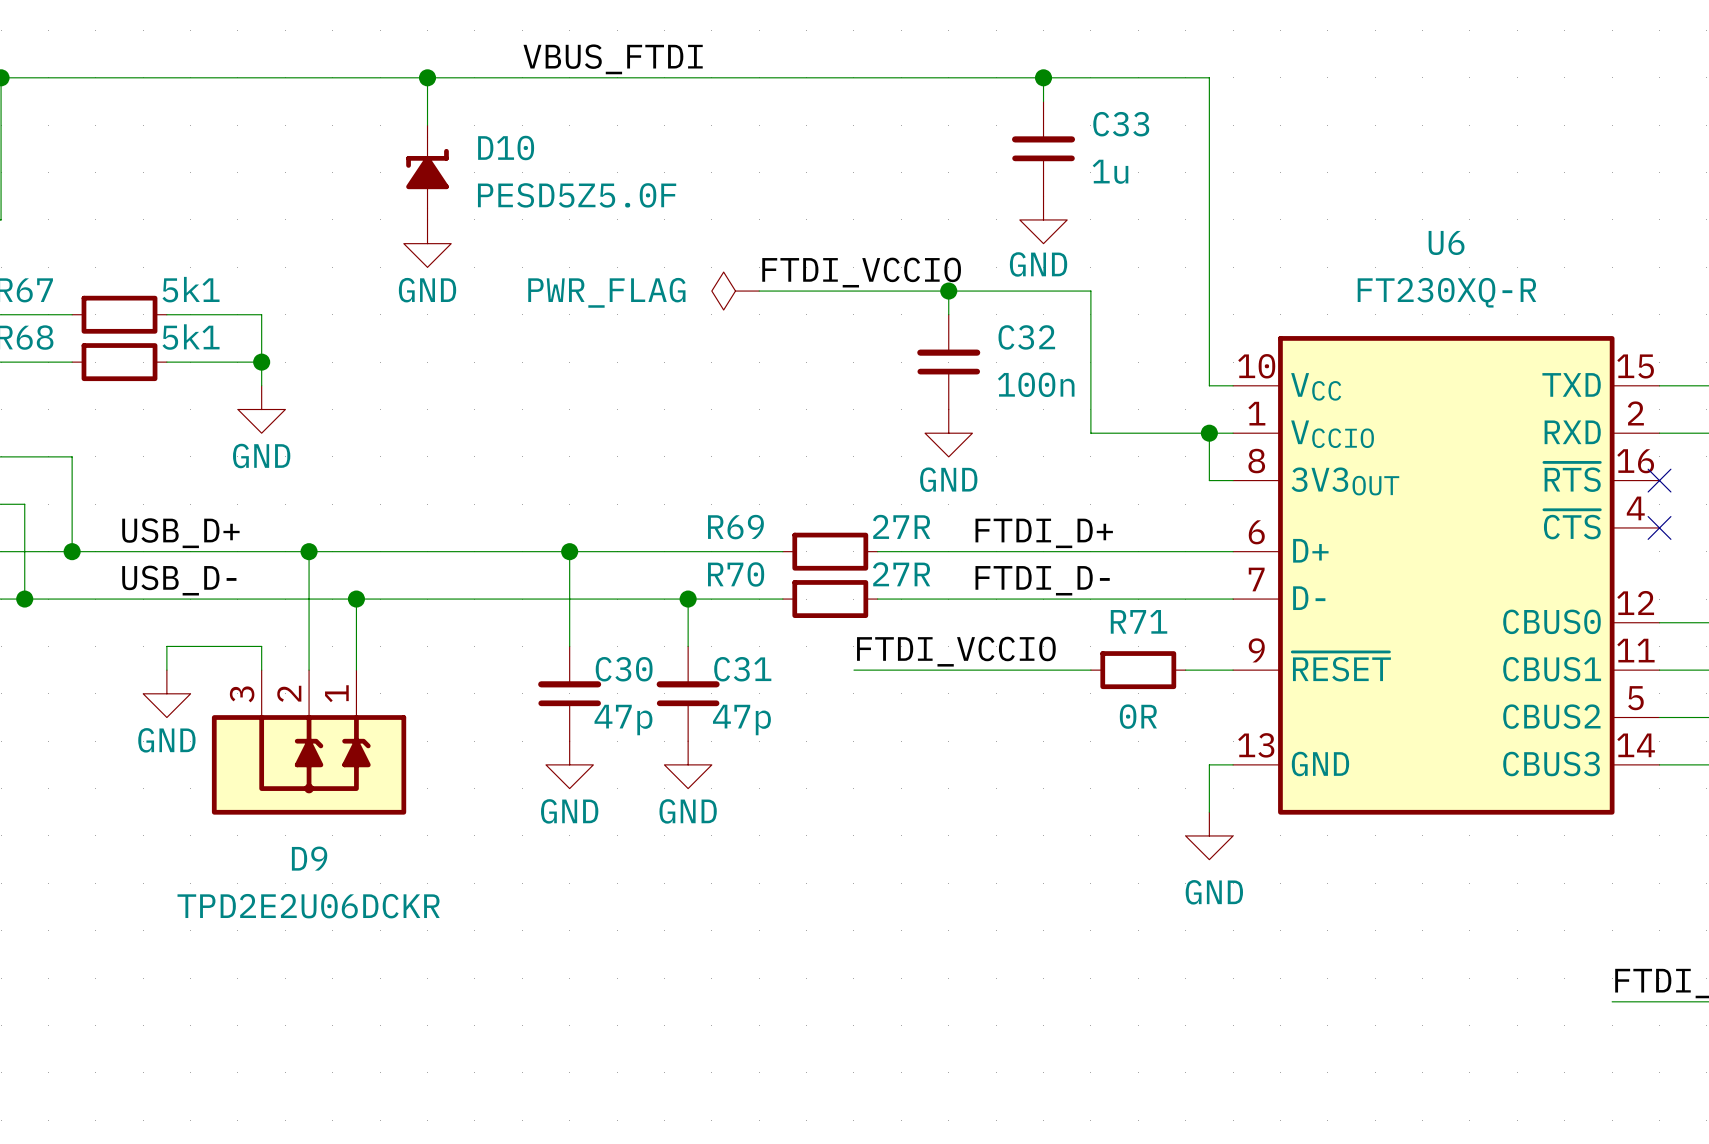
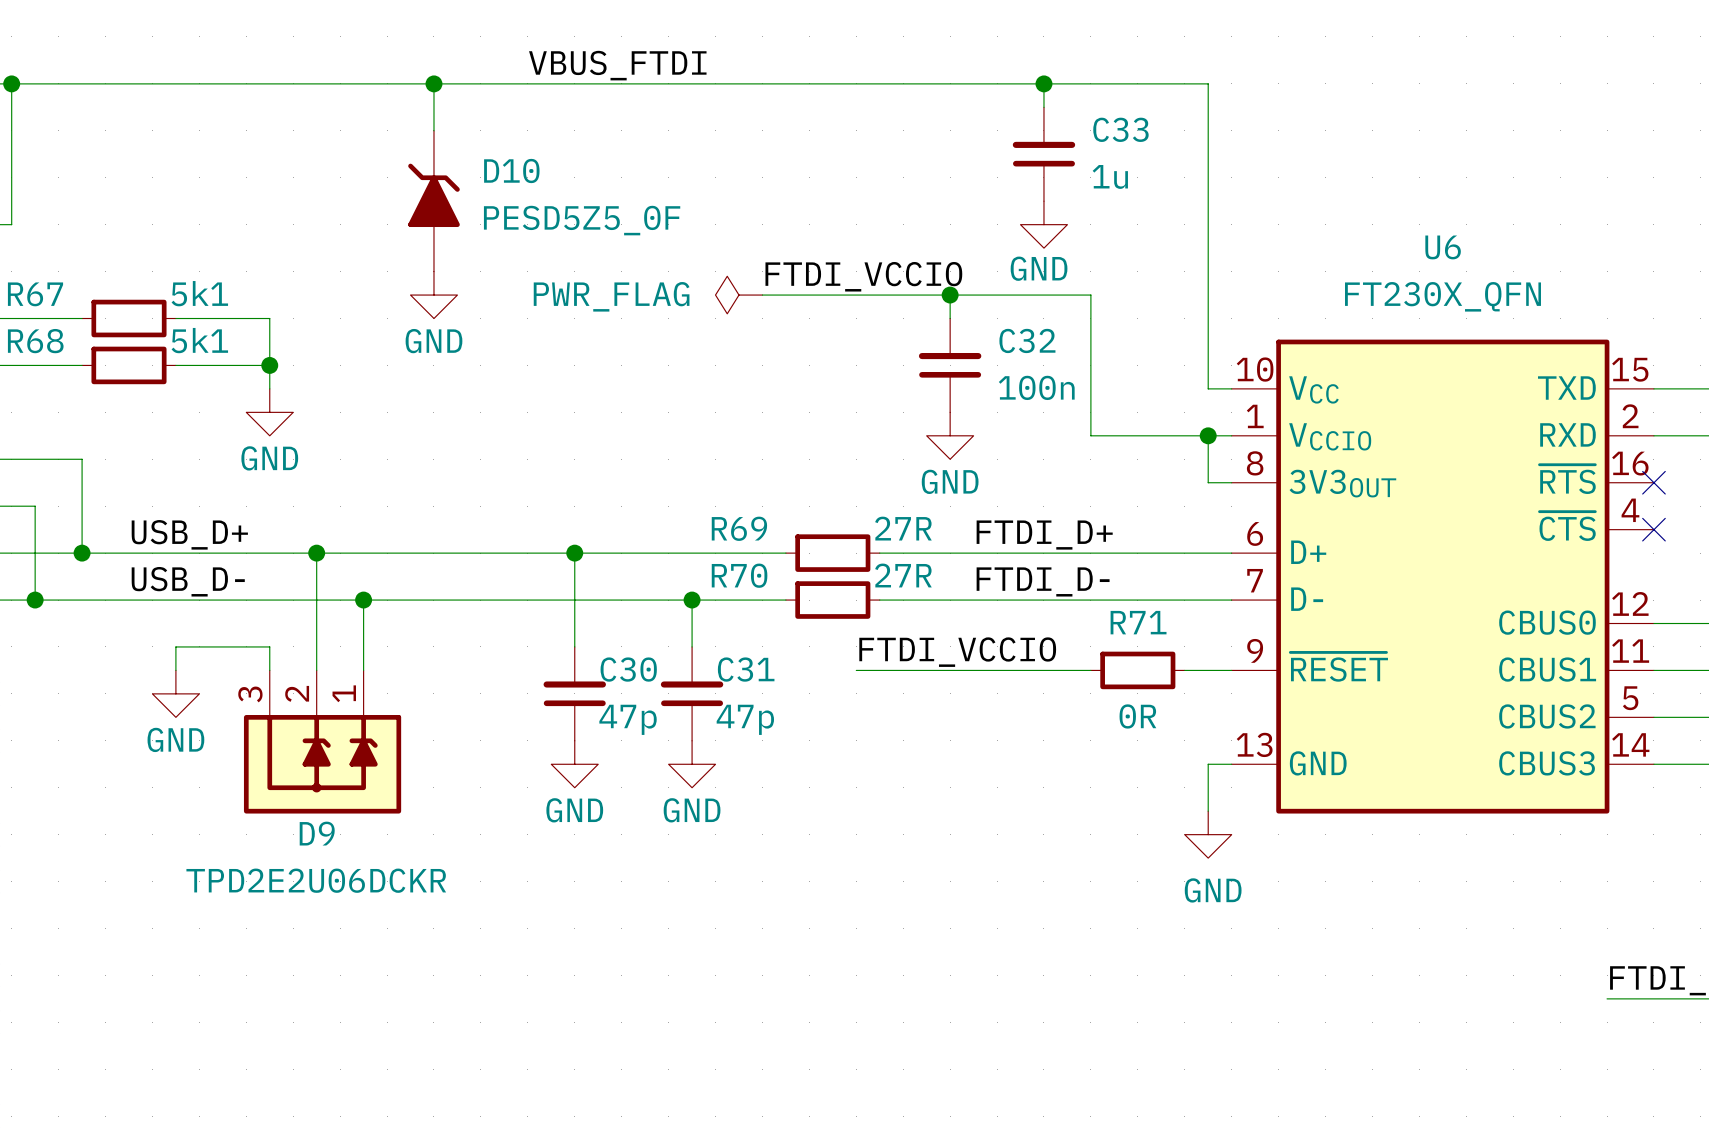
D10 symbol: [406, 125, 449, 220] -> [408, 130, 460, 272]
D10 text: PESD5Z5.0F (577, 195) -> none
D10 value: none -> PESD5Z5_0F (582, 220)
power symbol position: GND (427, 243) -> GND (433, 295)
U6 text: FT230XQ-R (1446, 292) -> none
U6 value: none -> FT230X_QFN (1442, 296)
D9 symbol: [211, 670, 407, 815] -> [243, 670, 402, 814]
D9 value: none -> TPD2E2U06DCKR (316, 880)
D9 text: TPD2E2U06DCKR (308, 906) -> none

